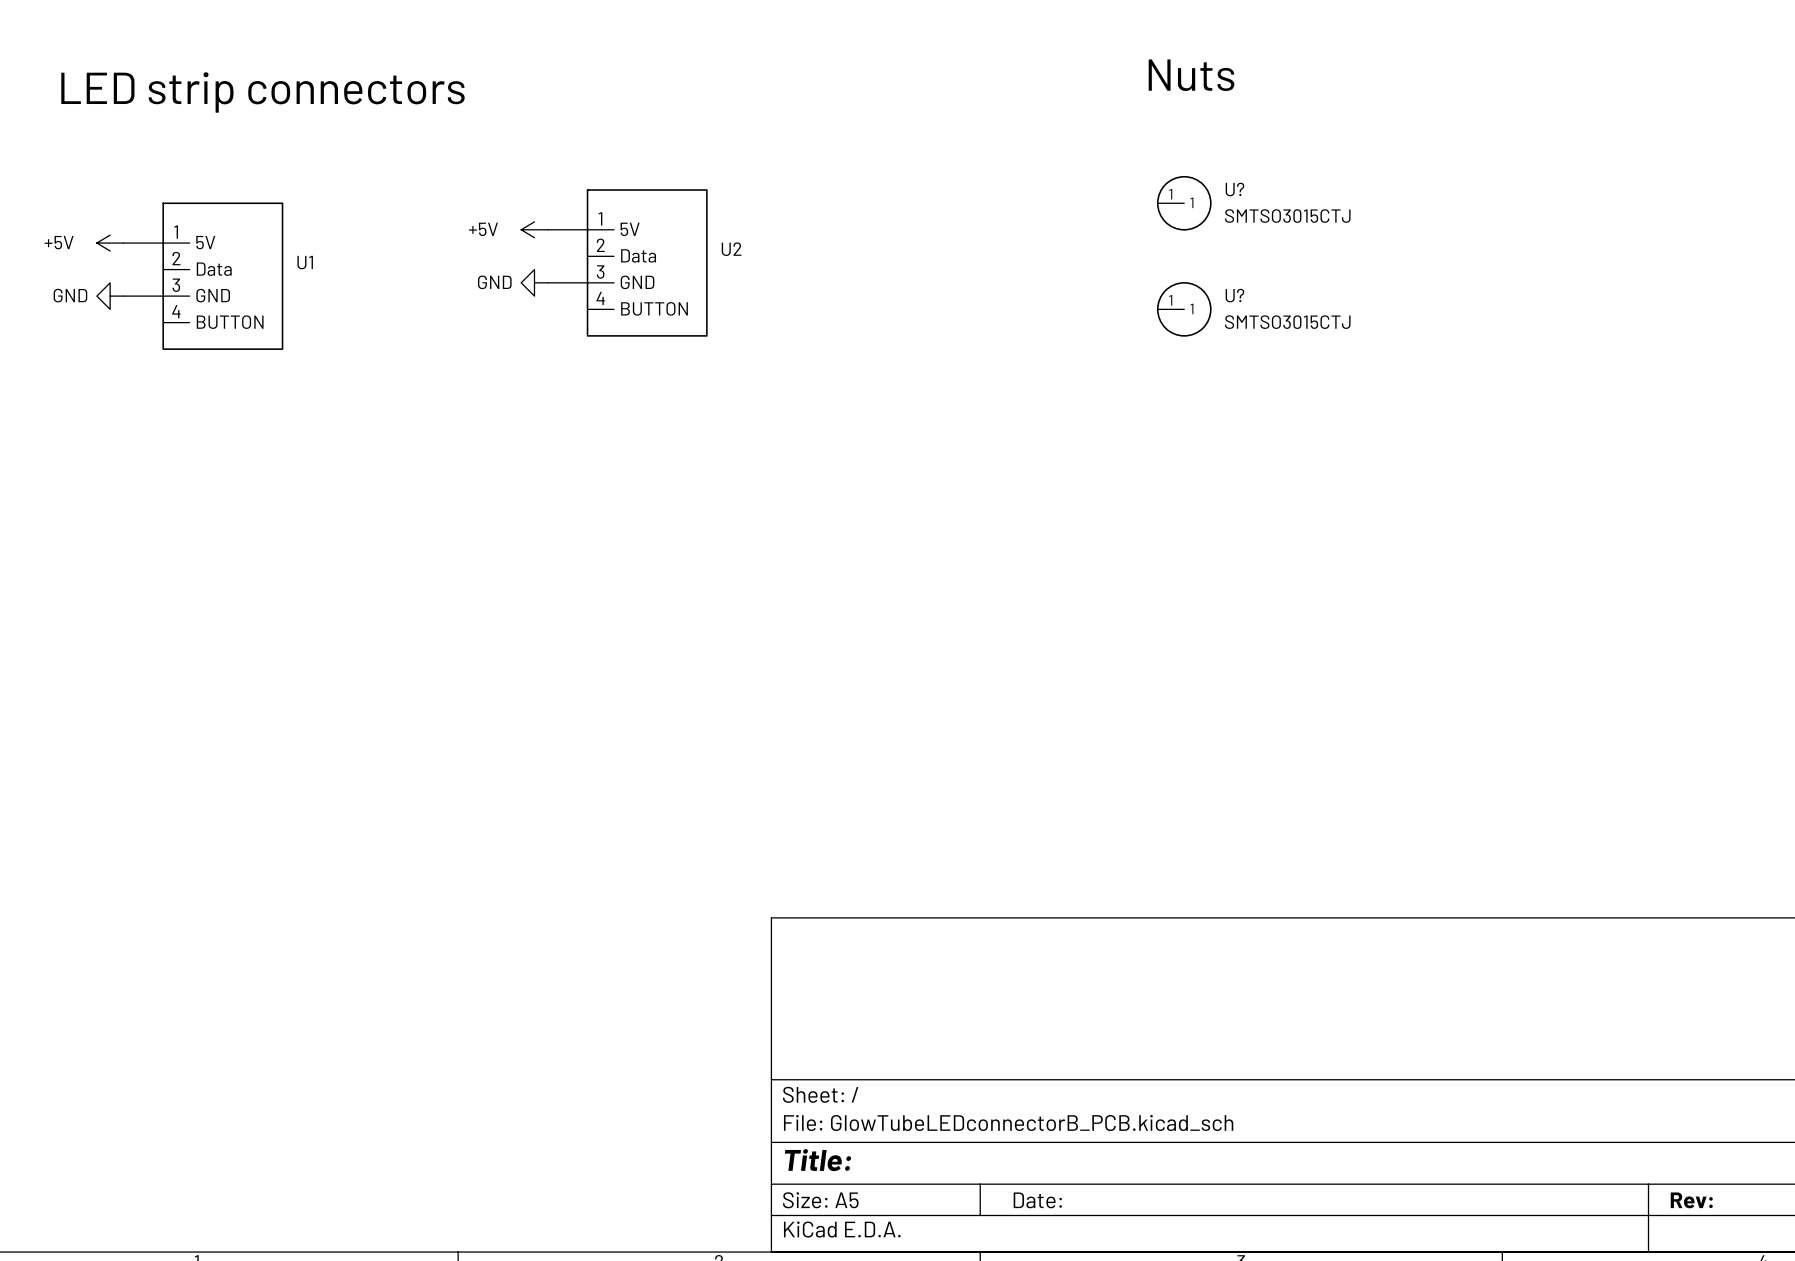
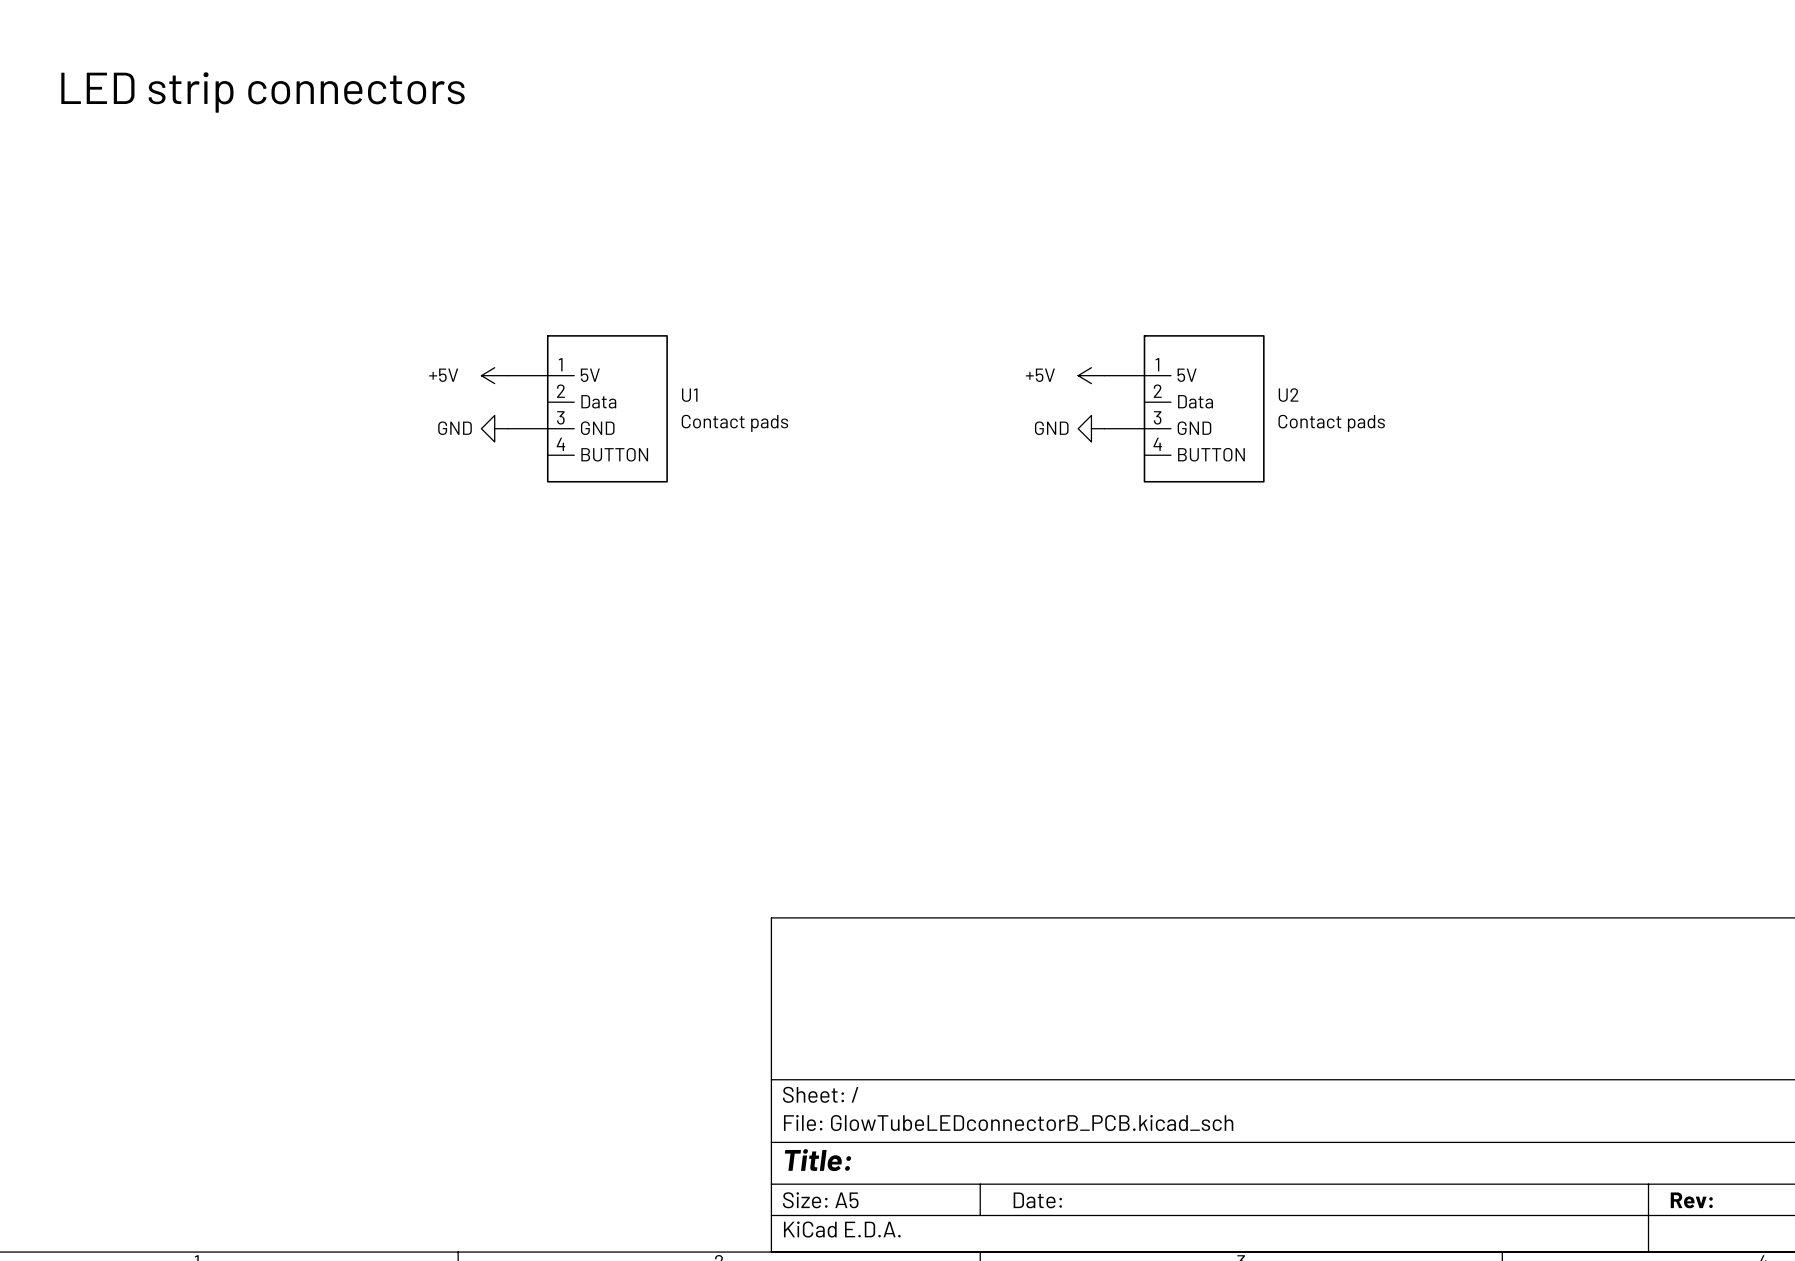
text: Nuts (1191, 75) -> none
U?: SMTSO3015CTJ (1184, 203) -> none
power symbol position: +5V (534, 229) -> +5V (494, 375)
wire: (547, 229) (587, 229) -> (507, 375) (547, 375)
power symbol: +5V (110, 243) -> none
wire: (123, 243) (163, 243) -> none
U2 position: (647, 262) -> (1204, 408)
U1 position: (222, 276) -> (607, 408)
power symbol position: GND (534, 282) -> GND (494, 428)
wire: (547, 282) (587, 282) -> (507, 428) (547, 428)
power symbol: GND (110, 296) -> none
wire: (123, 296) (163, 296) -> none
U?: SMTSO3015CTJ (1184, 309) -> none
power symbol: none -> +5V (1091, 375)
wire: none -> (1104, 375) (1144, 375)
U1 value: none -> Contact pads (734, 423)
U2 value: none -> Contact pads (1331, 423)
power symbol: none -> GND (1091, 428)
wire: none -> (1104, 428) (1144, 428)

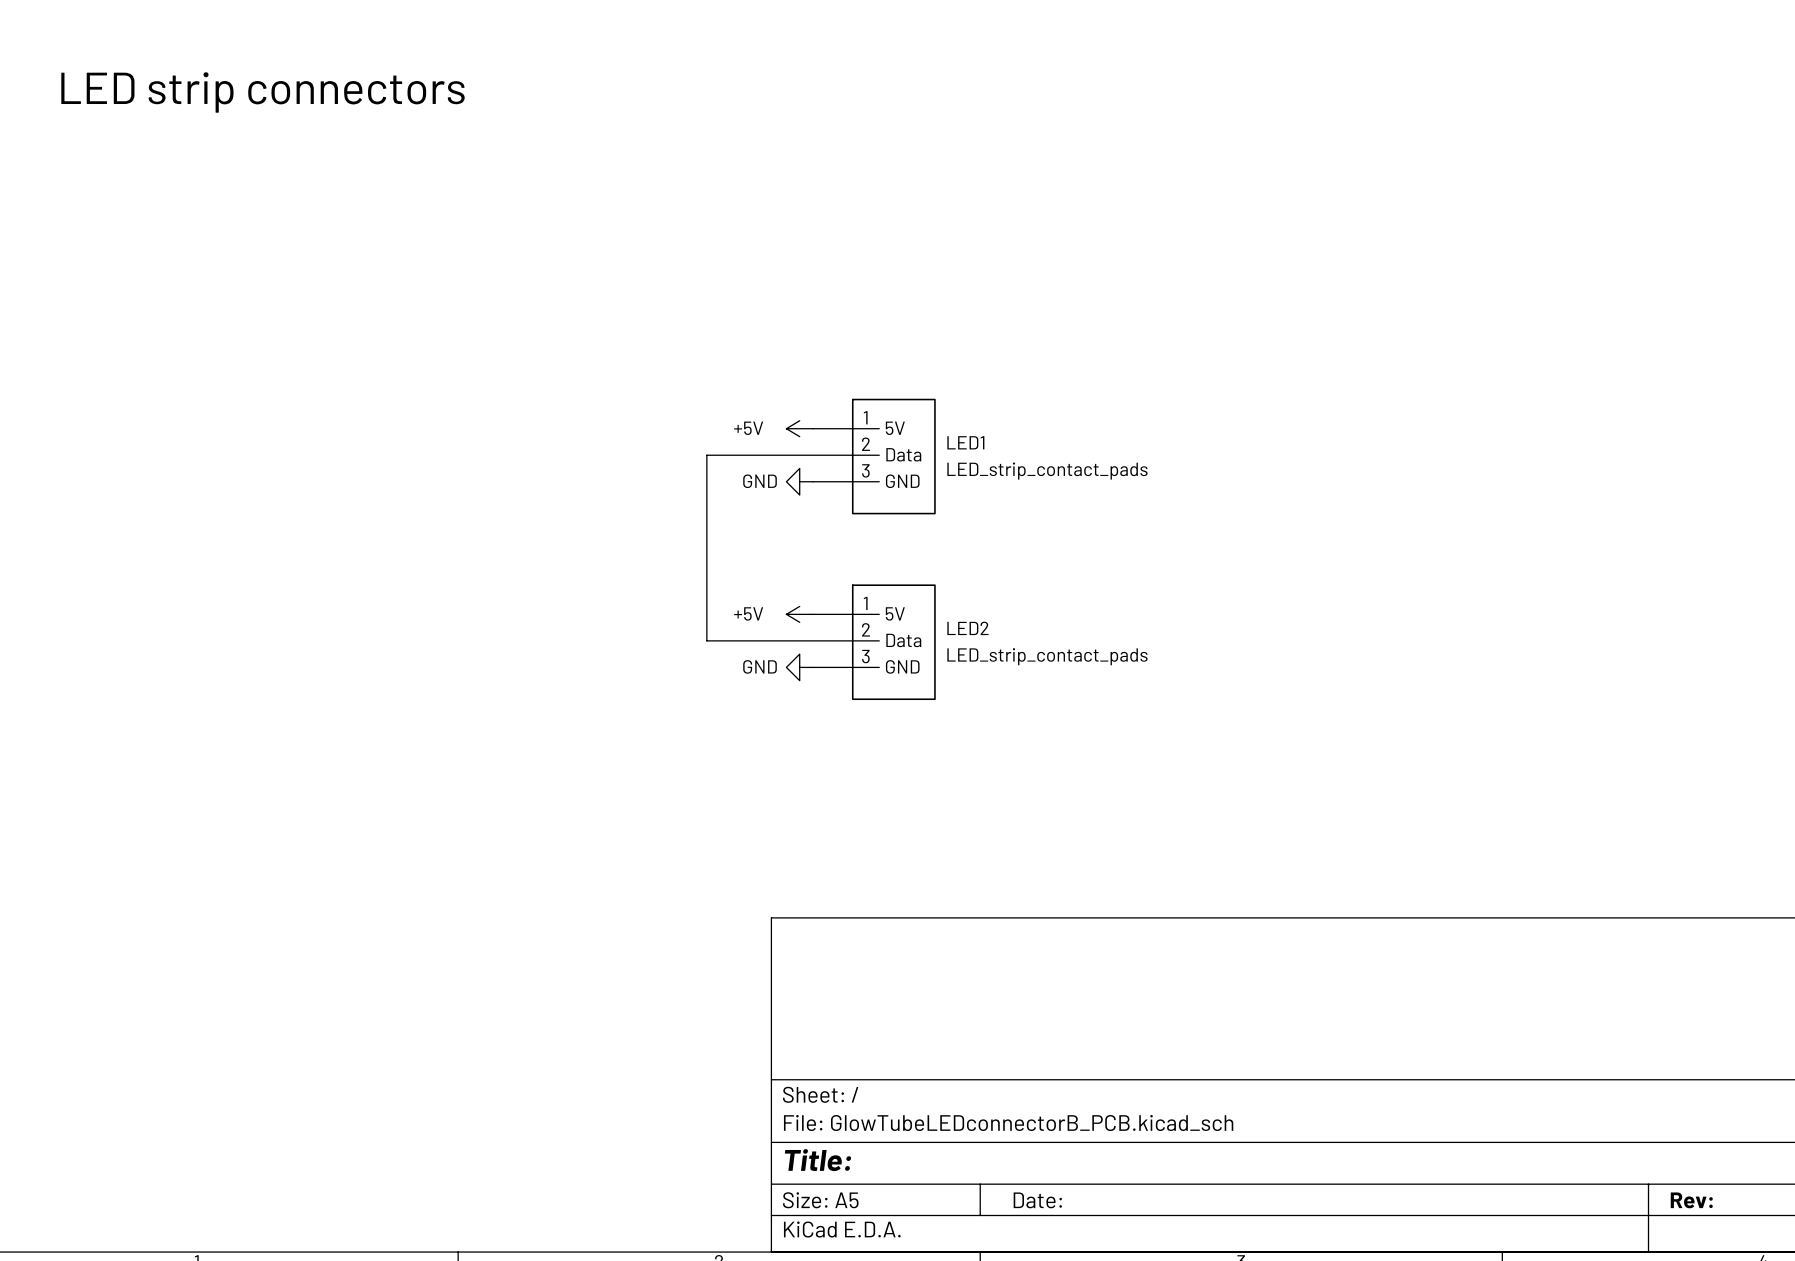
power symbol: +5V (494, 375) -> none
wire: (507, 375) (547, 375) -> none
power symbol: +5V (1091, 375) -> none
wire: (1104, 375) (1144, 375) -> none
U1: Contact pads (607, 408) -> none
U2: Contact pads (1204, 408) -> none
power symbol: GND (494, 428) -> none
wire: (507, 428) (547, 428) -> none
power symbol: none -> +5V (799, 428)
wire: none -> (812, 428) (852, 428)
power symbol: GND (1091, 428) -> none
wire: (1104, 428) (1144, 428) -> none
wire: none -> (852, 455) (706, 455) (706, 640) (852, 640)
LED1: none -> LED_strip_contact_pads (893, 456)
power symbol: none -> GND (799, 481)
wire: none -> (812, 481) (852, 481)
power symbol: none -> +5V (799, 614)
wire: none -> (812, 614) (852, 614)
LED2: none -> LED_strip_contact_pads (893, 642)
power symbol: none -> GND (799, 667)
wire: none -> (812, 667) (852, 667)

